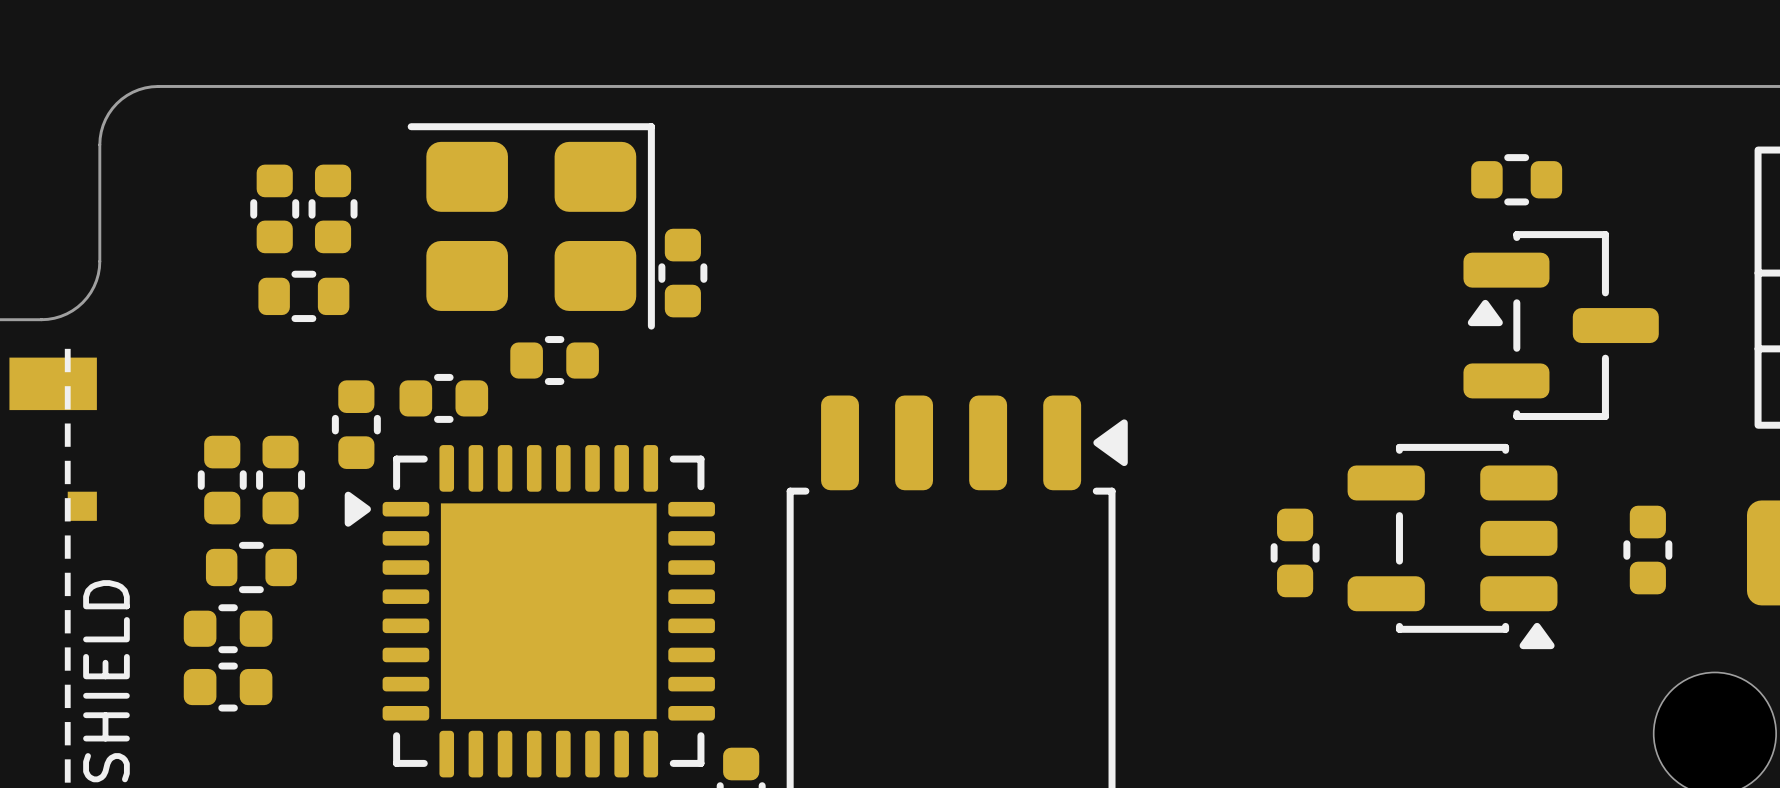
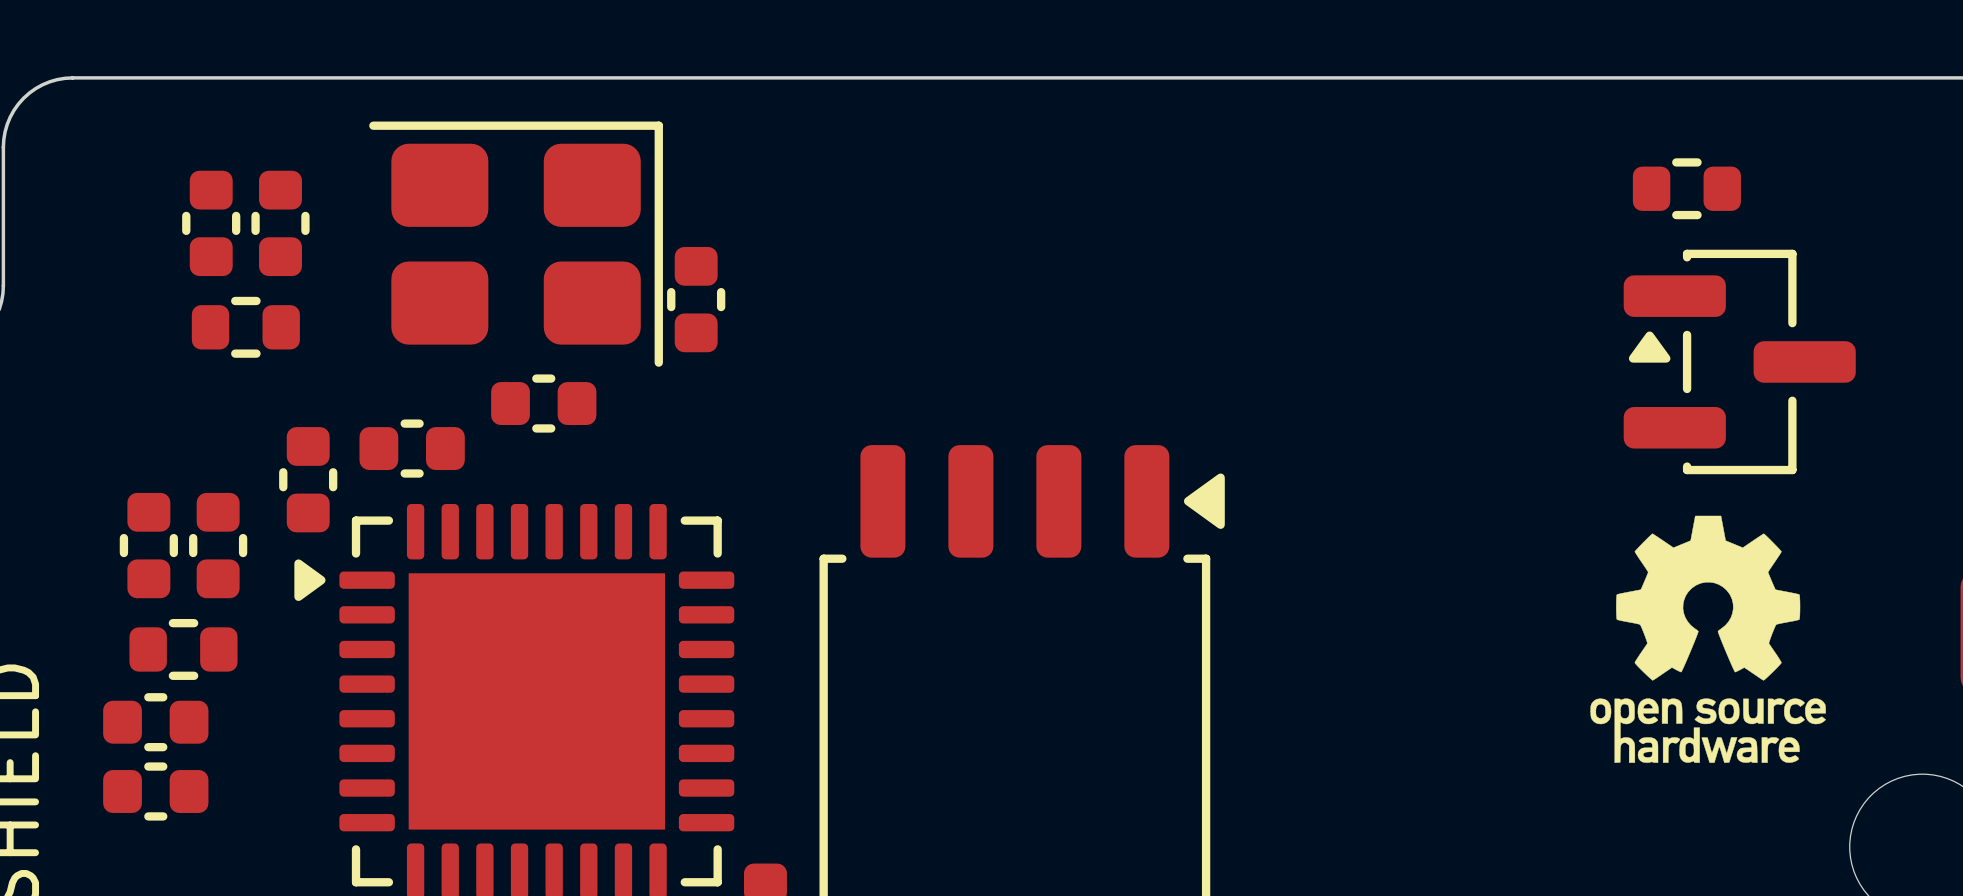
drawing: none -> [1590, 515, 1826, 763]
part: (1452, 546) -> none
part: (1647, 550) -> none
part: (1295, 552) -> none

